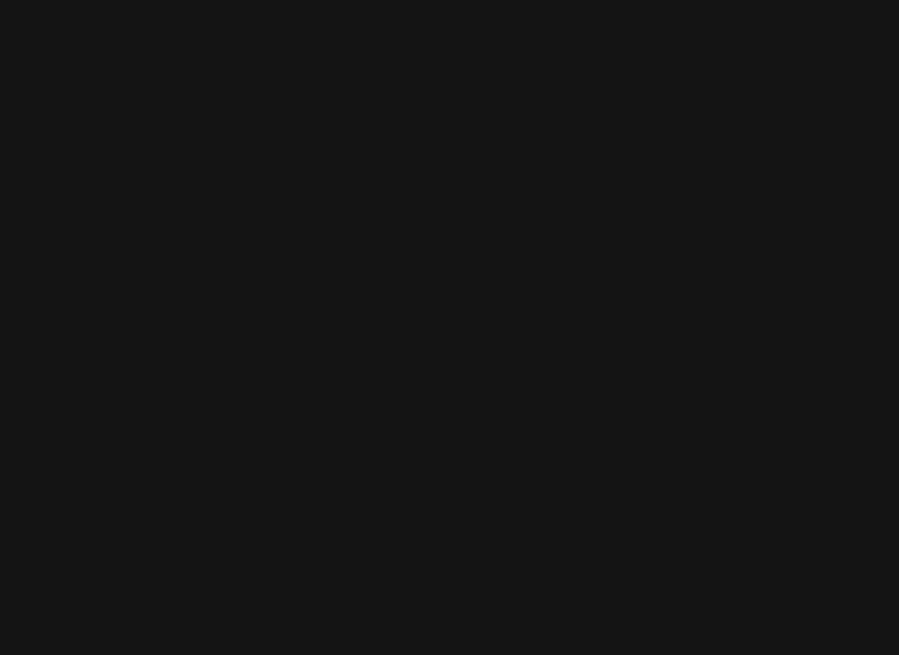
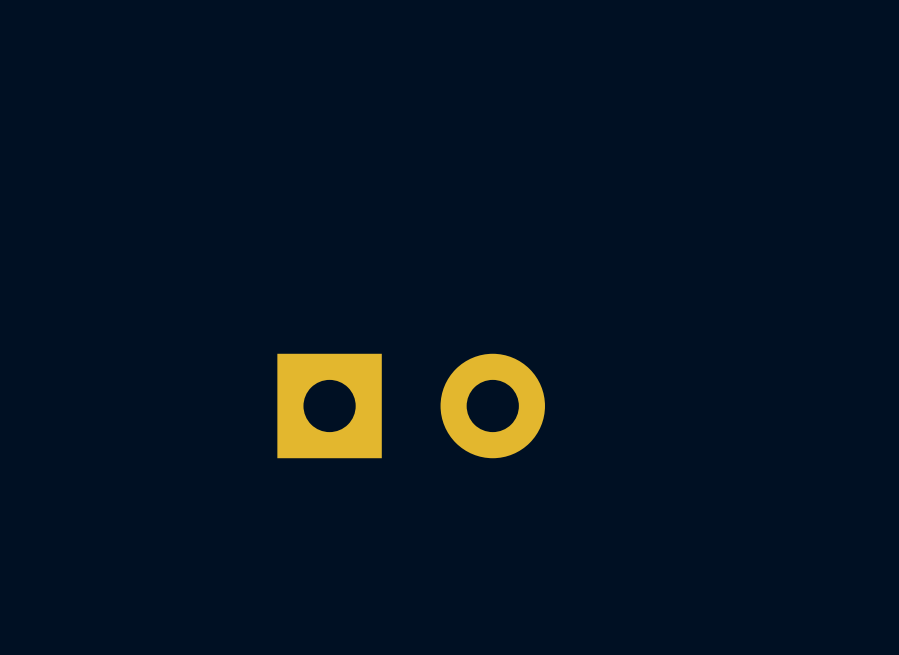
part: none -> (411, 406)

